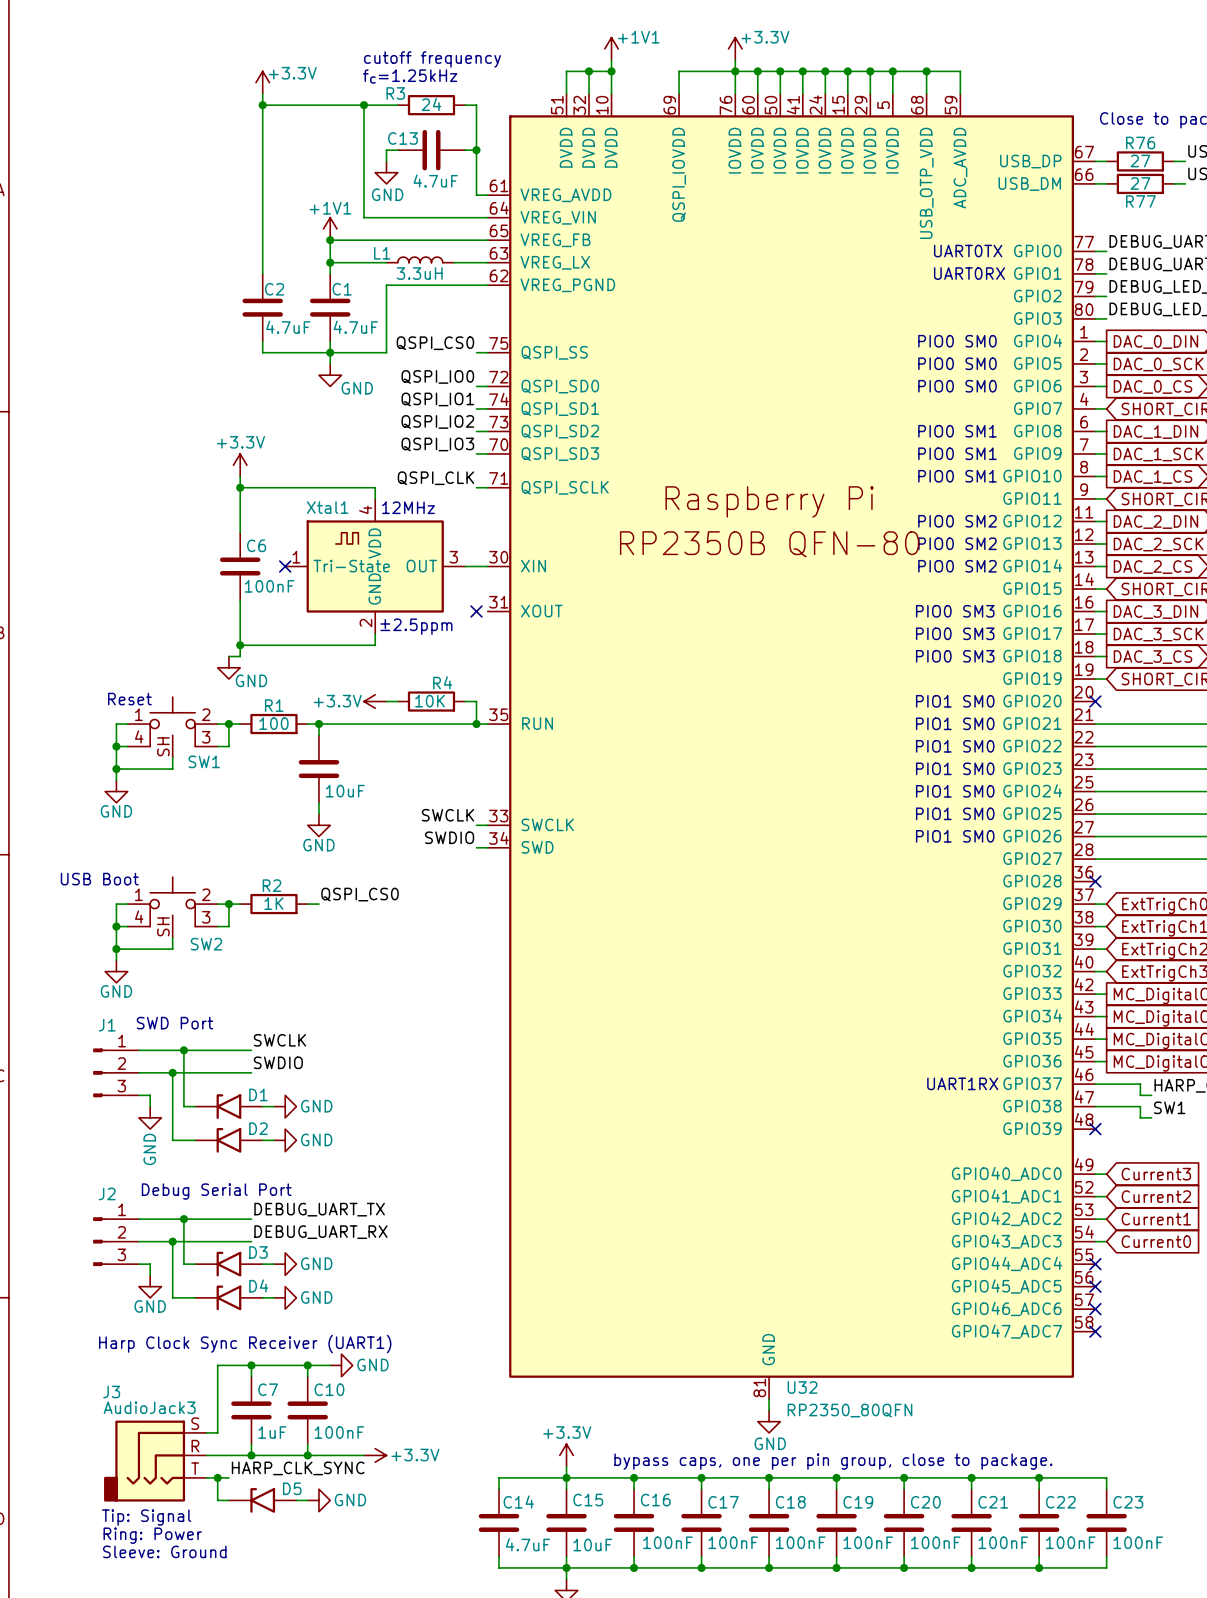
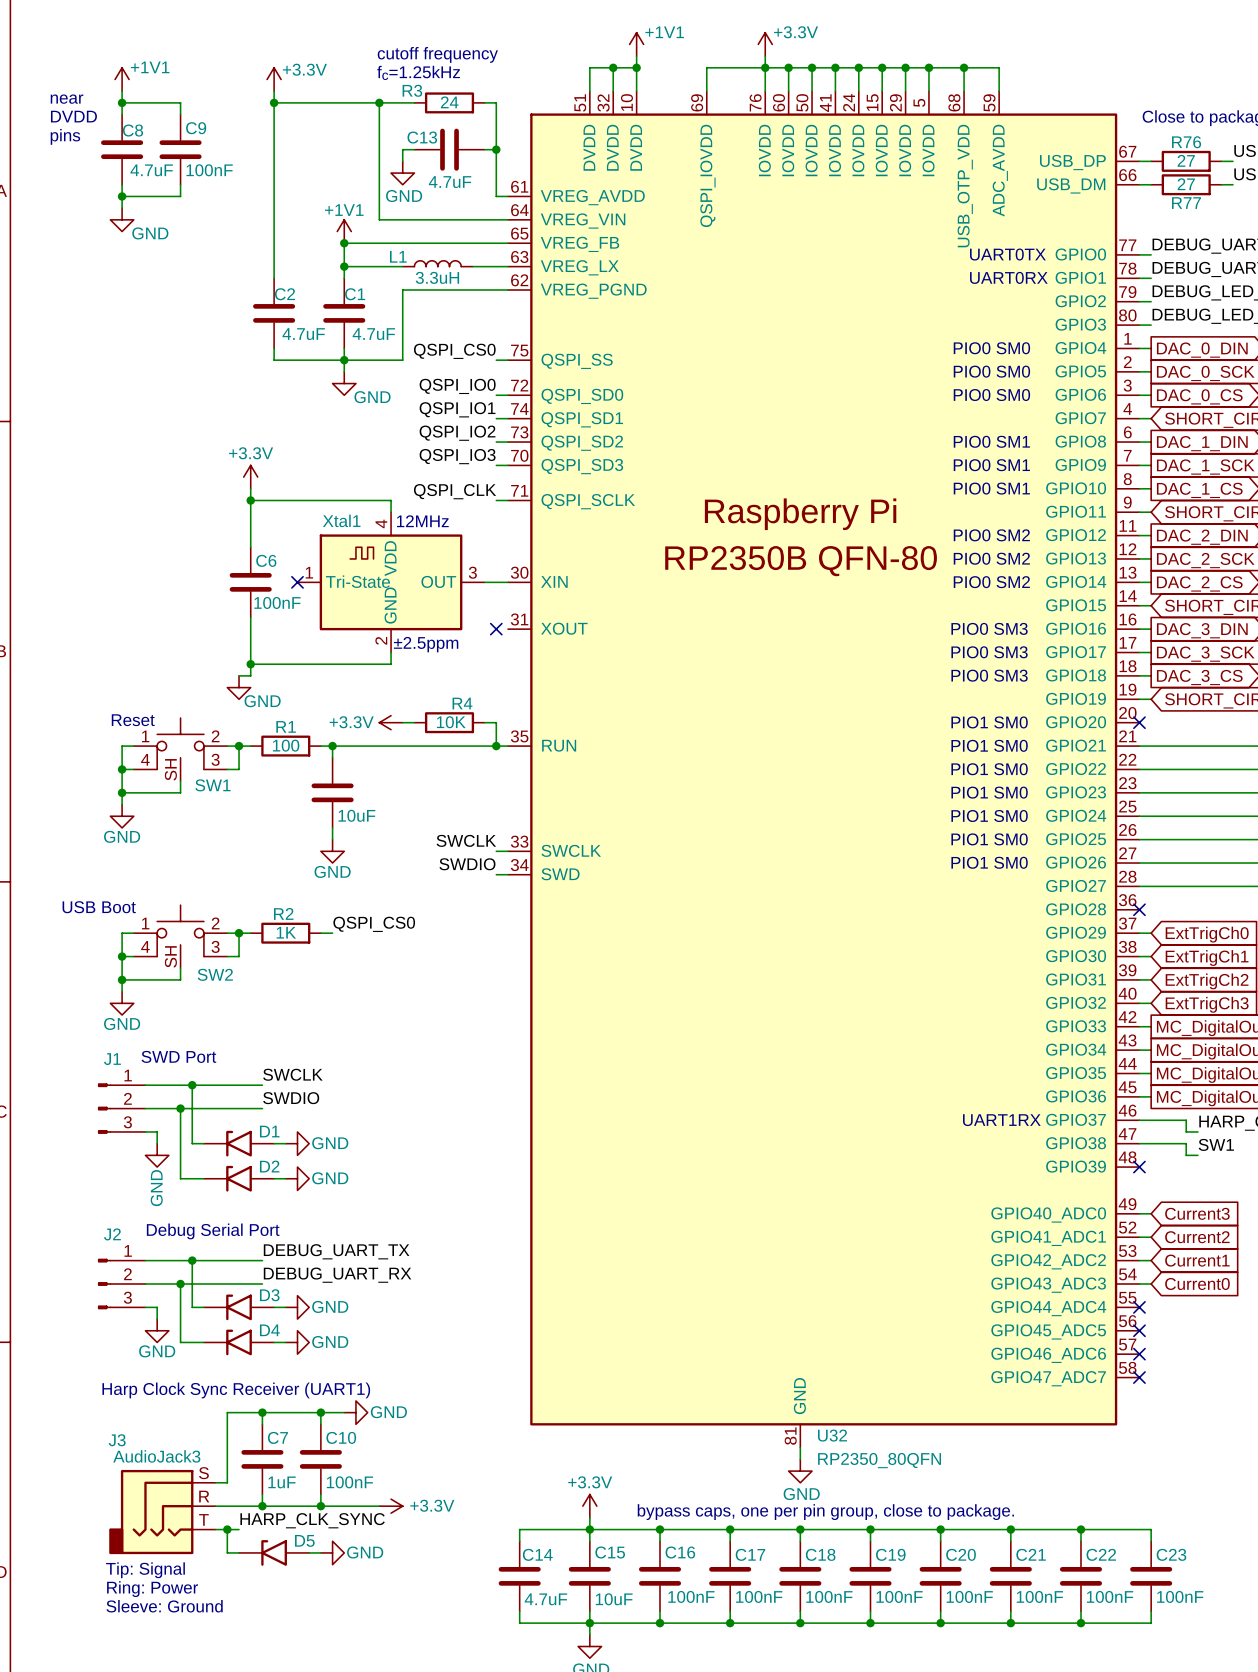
power symbol: none -> +1V1 (122, 79)
wire: none -> (122, 91) (122, 114)
text: none -> near (67, 99)
wire: none -> (122, 102) (180, 102) (180, 114)
junction: none -> (122, 102)
text: none -> DVDD (73, 116)
text: none -> pins (65, 136)
C8: none -> 4.7uF (122, 149)
C9: none -> 100nF (180, 149)
wire: none -> (122, 184) (122, 208)
wire: none -> (180, 184) (180, 196) (122, 196)
junction: none -> (122, 196)
power symbol: none -> GND (122, 219)

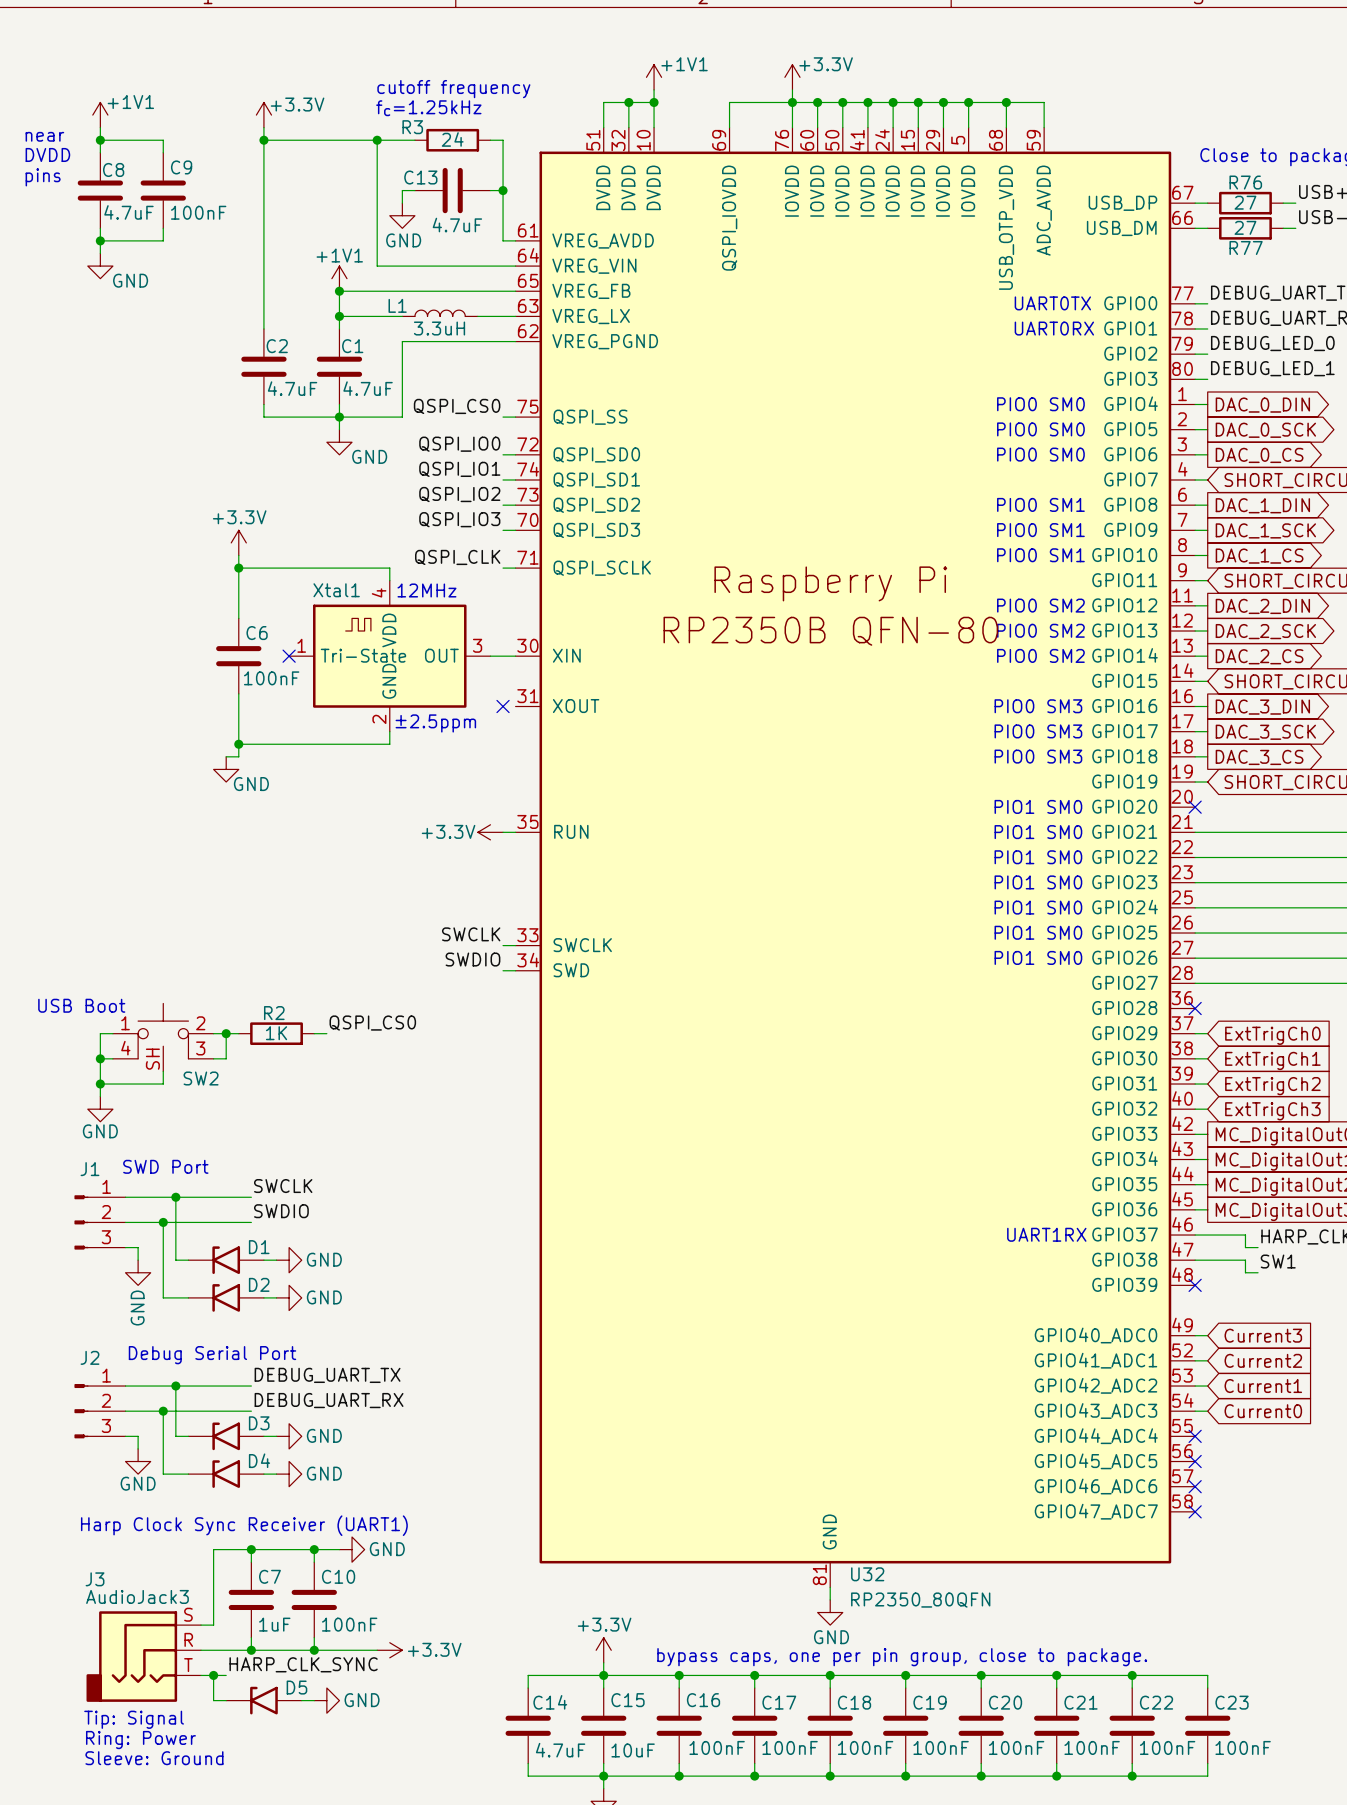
text: Reset (133, 720) -> none
power symbol position: +3.3V (391, 722) -> +3.3V (490, 832)
wire: (402, 722) (414, 722) -> none
R4: 10K (449, 722) -> none
wire: (484, 722) (496, 722) (496, 746) (320, 746) -> none
wire: (133, 746) (122, 746) (122, 804) -> none
wire: (227, 746) (250, 746) -> none
wire: (239, 746) (239, 769) (227, 769) -> none
junction: (239, 746) -> none
R1: 100 (285, 746) -> none
wire: (332, 746) (332, 757) -> none
junction: (332, 746) -> none
junction: (496, 746) -> none
SW1: (180, 749) -> none
wire: (122, 769) (133, 769) -> none
junction: (122, 769) -> none
wire: (180, 781) (180, 792) (122, 792) -> none
junction: (122, 792) -> none
part: 10uF (332, 792) -> none
power symbol: GND (122, 816) -> none
wire: (332, 827) (332, 839) -> none
power symbol: GND (332, 851) -> none

